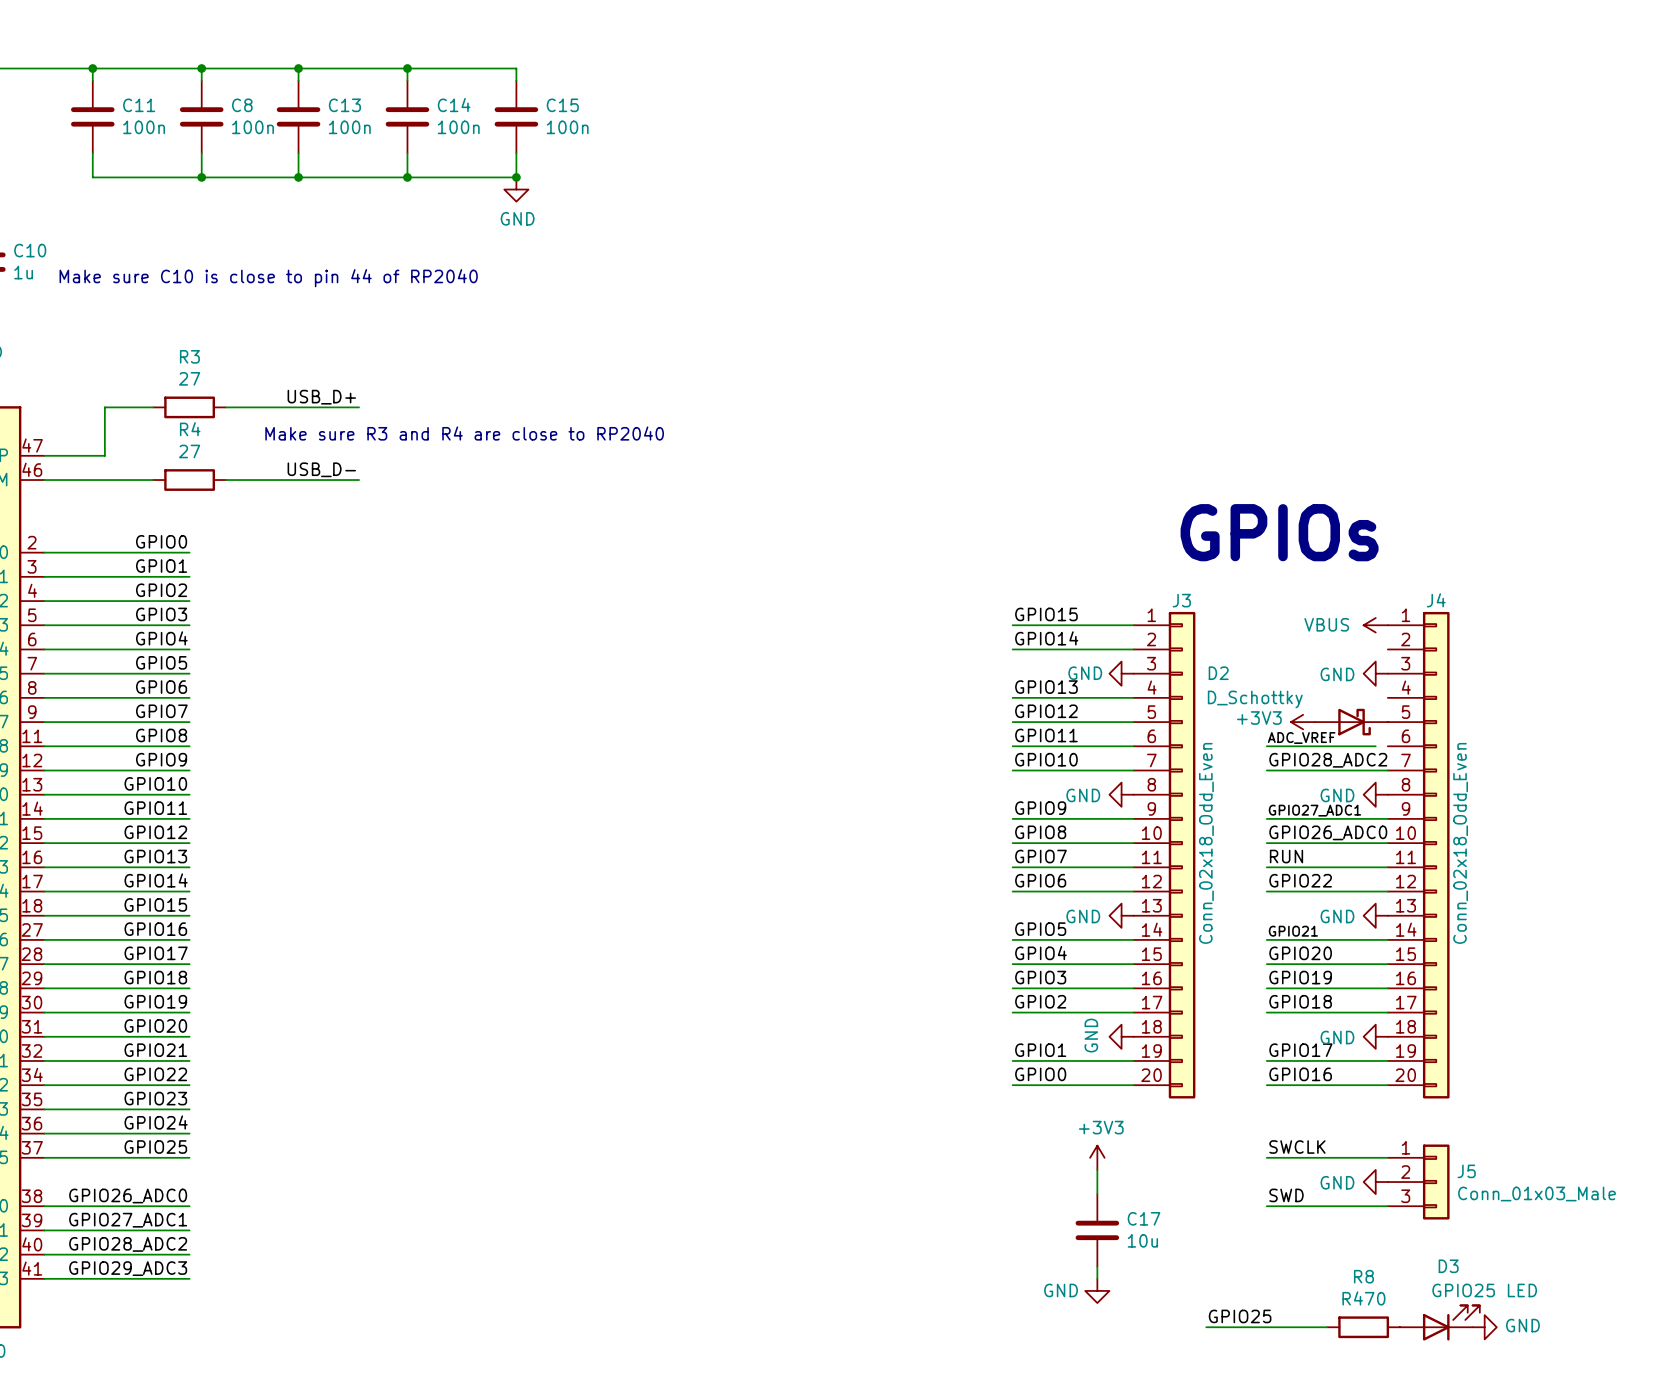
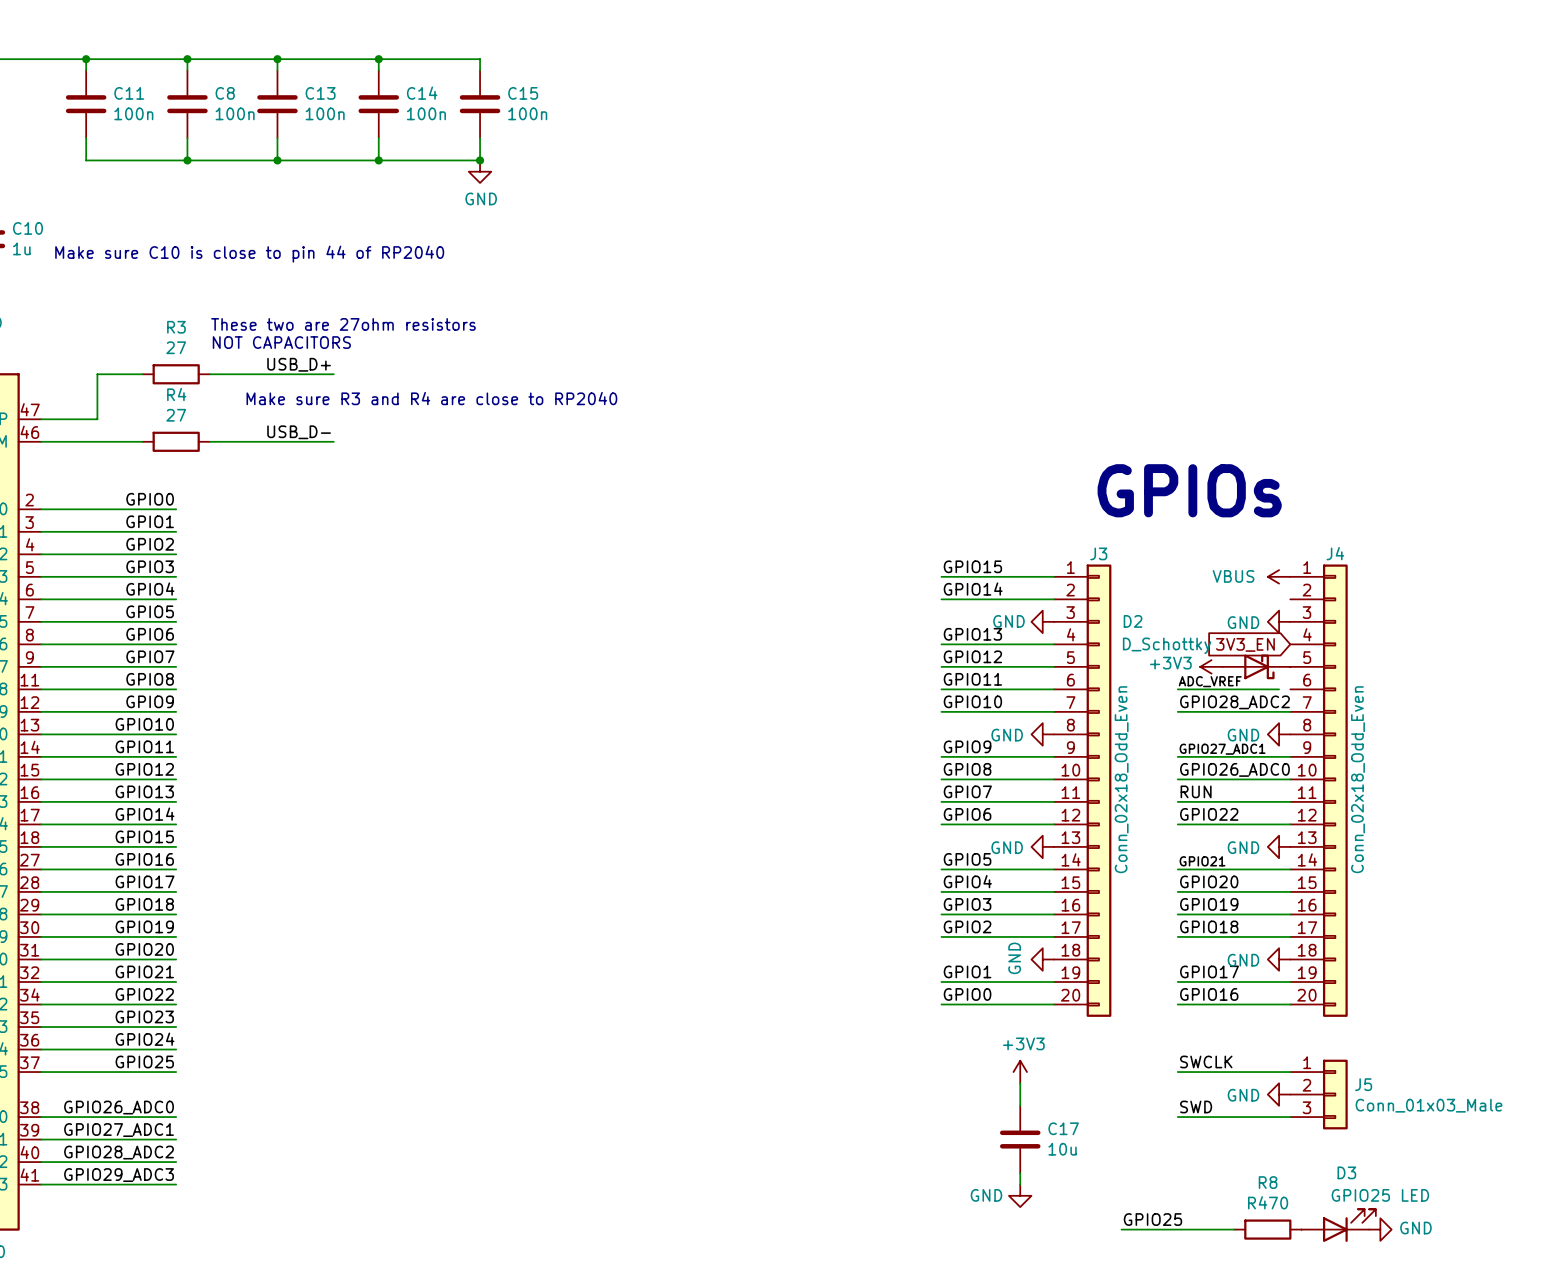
text: none -> These two are 27ohm resistors (343, 324)
text: none -> NOT CAPACITORS (281, 342)
global label: none -> 3V3_EN (1245, 644)

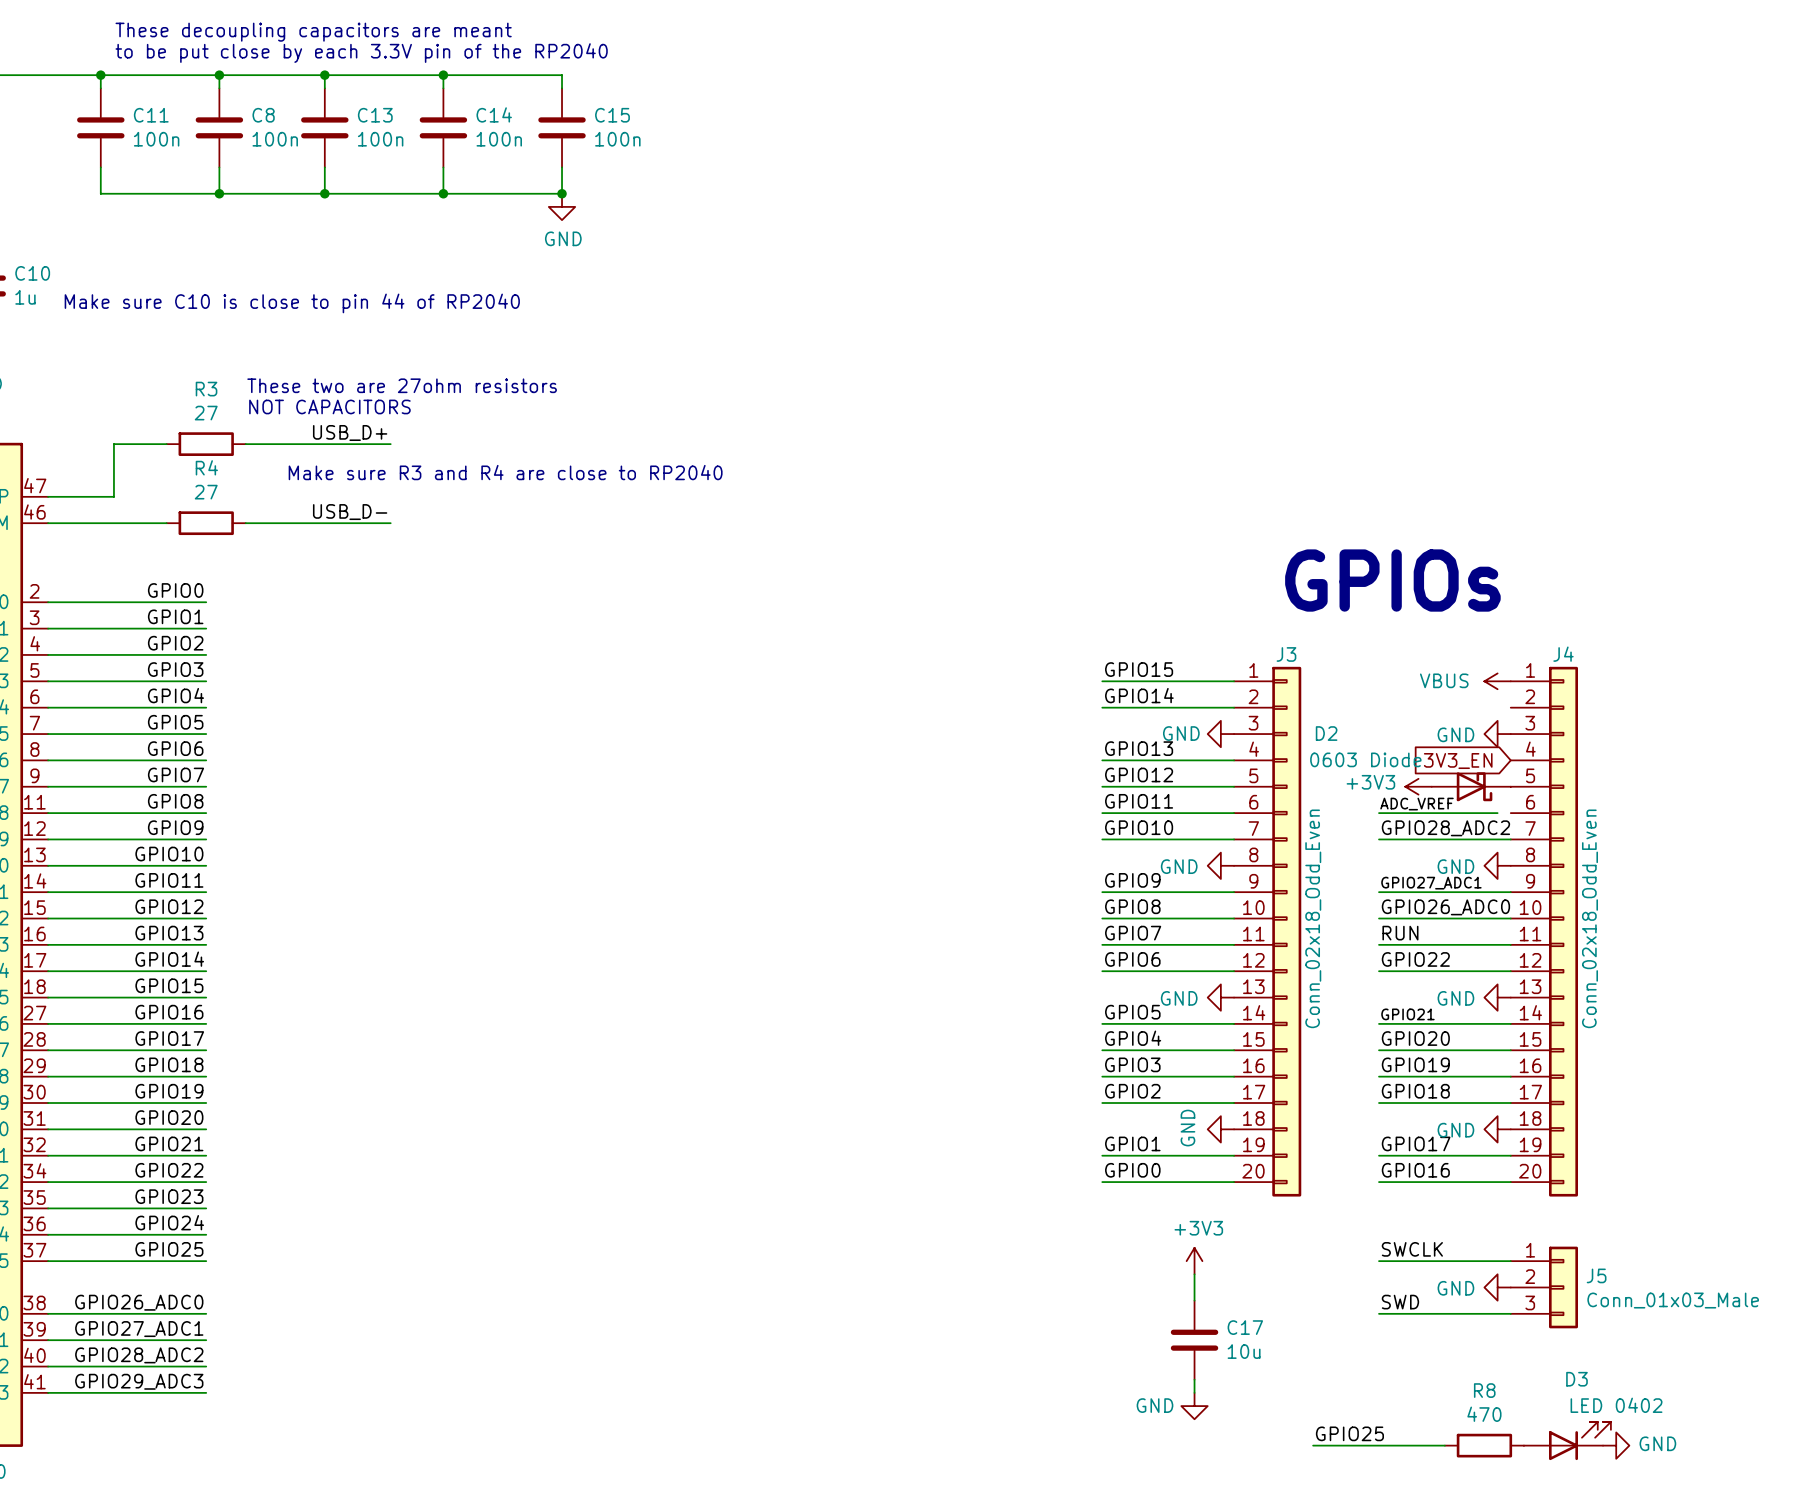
text: none -> These decoupling capacitors are meant (313, 32)
text: none -> to be put close by each 3.3V pin of the RP2040 (361, 53)
D2 value: D_Schottky (1167, 645) -> 0603 Diode (1365, 759)
D3 value: GPIO25 LED (1380, 1195) -> LED 0402 (1616, 1405)
R8 value: R470 (1268, 1202) -> 470 (1484, 1414)

